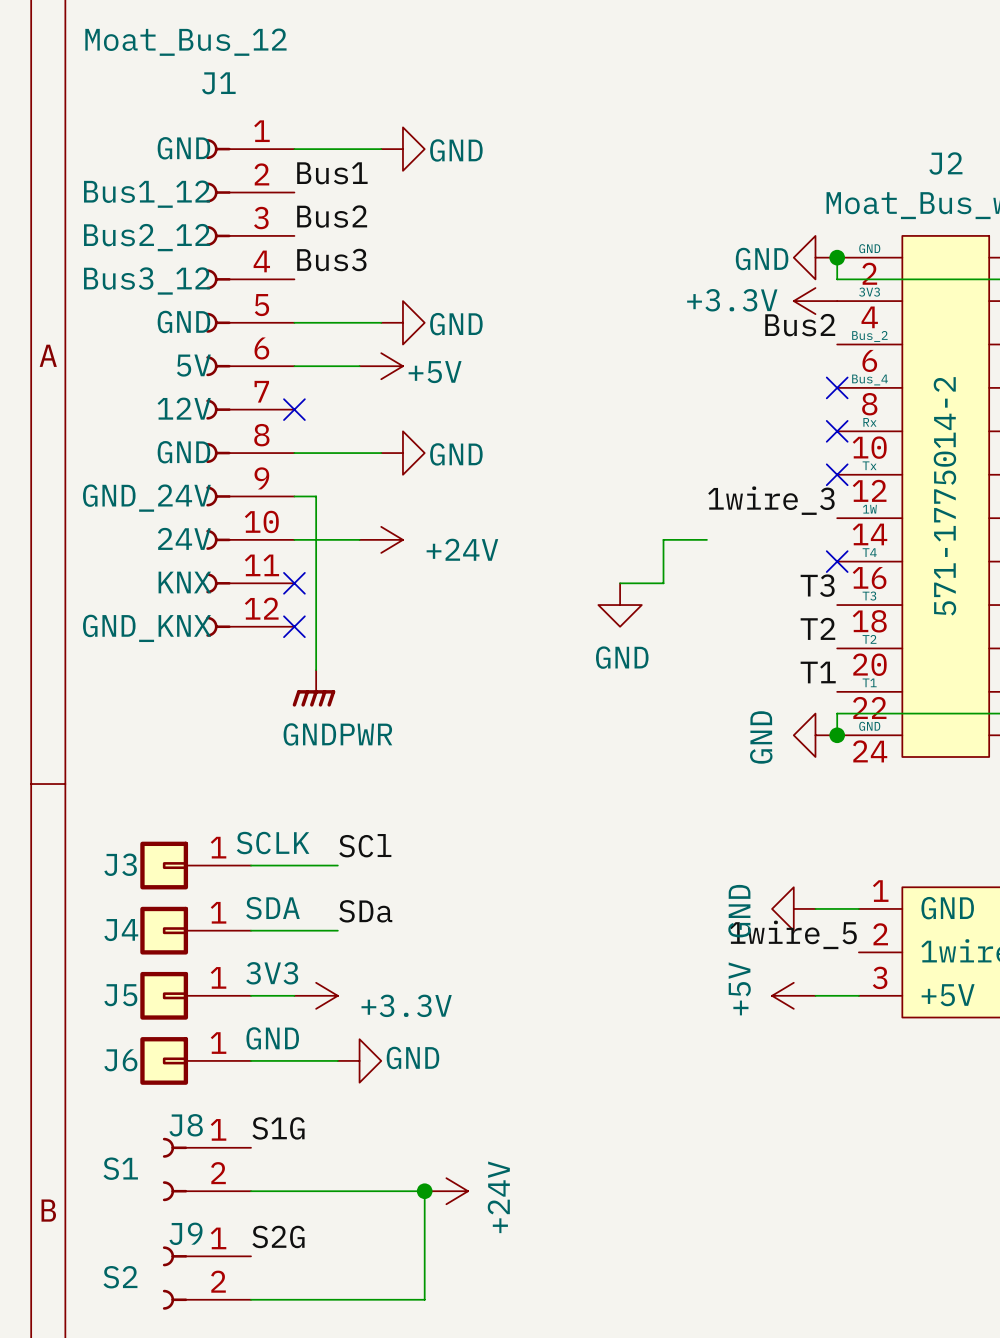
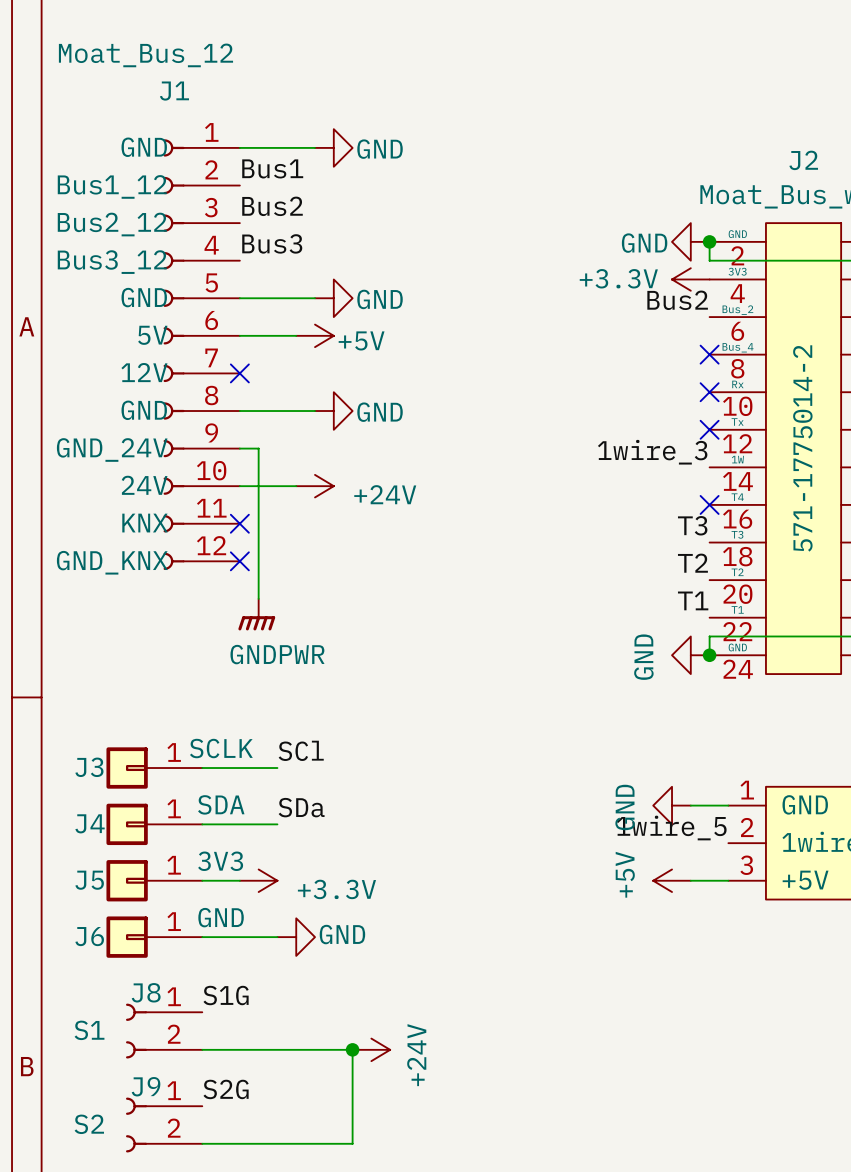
wire: (706, 539) (663, 539) (663, 583) (620, 583) -> none
power symbol: GND (620, 605) -> none

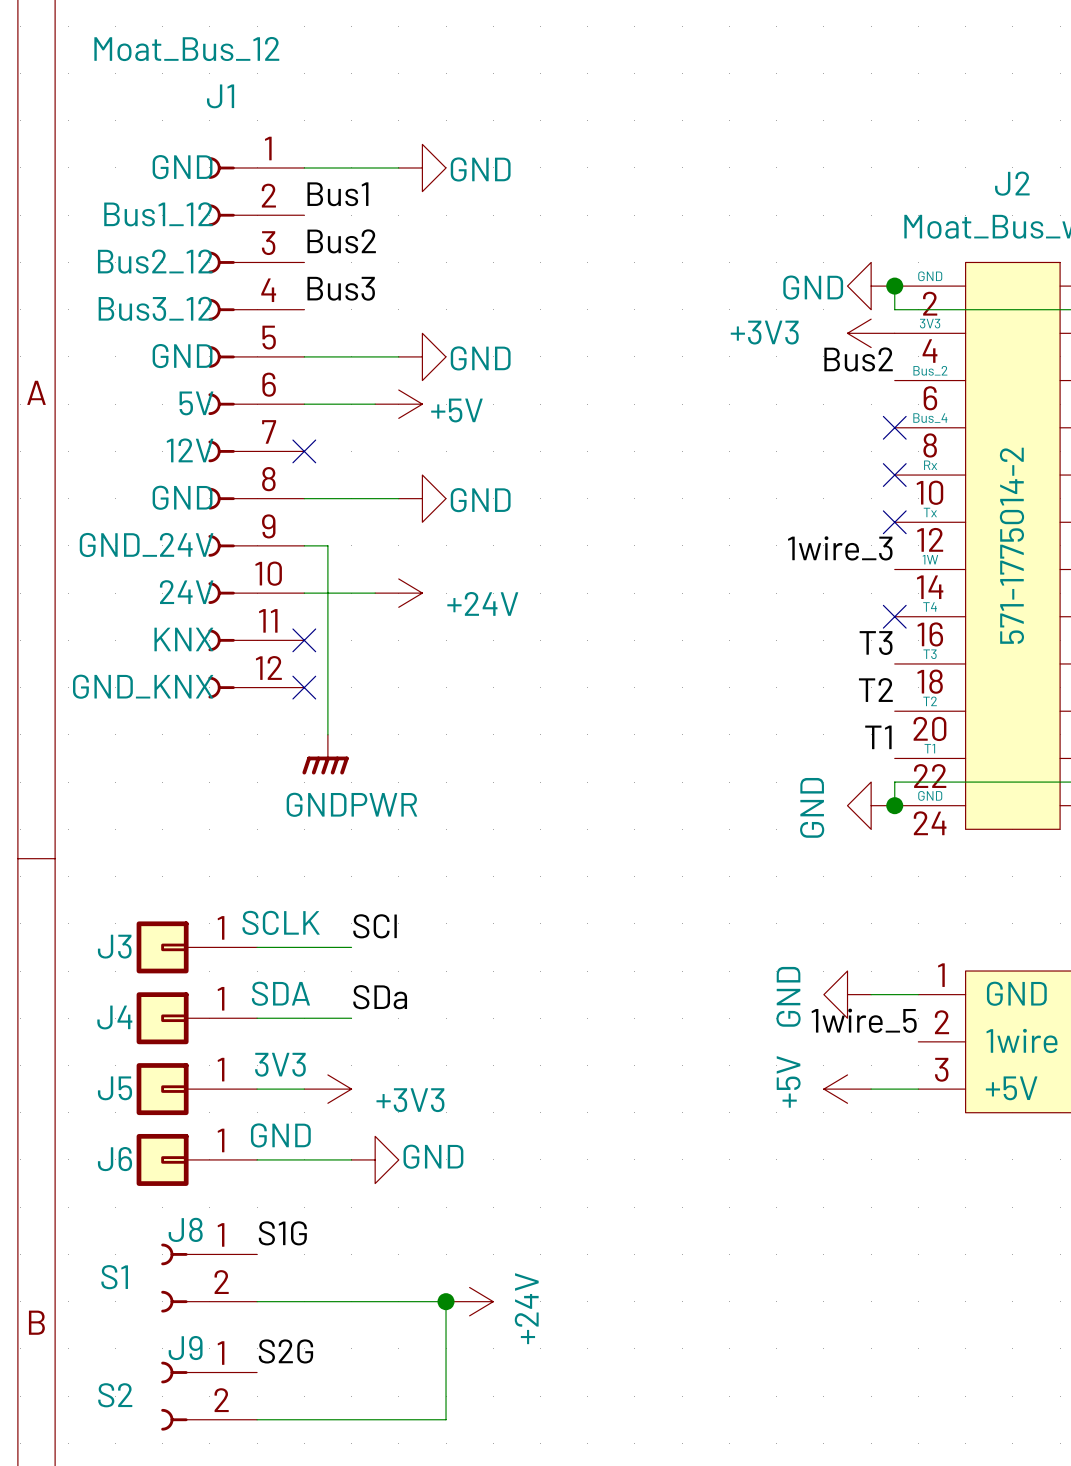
power symbol: +3.3V (690, 279) -> +3V3 (871, 333)
power symbol: +3.3V (258, 880) -> +3V3 (327, 1089)

